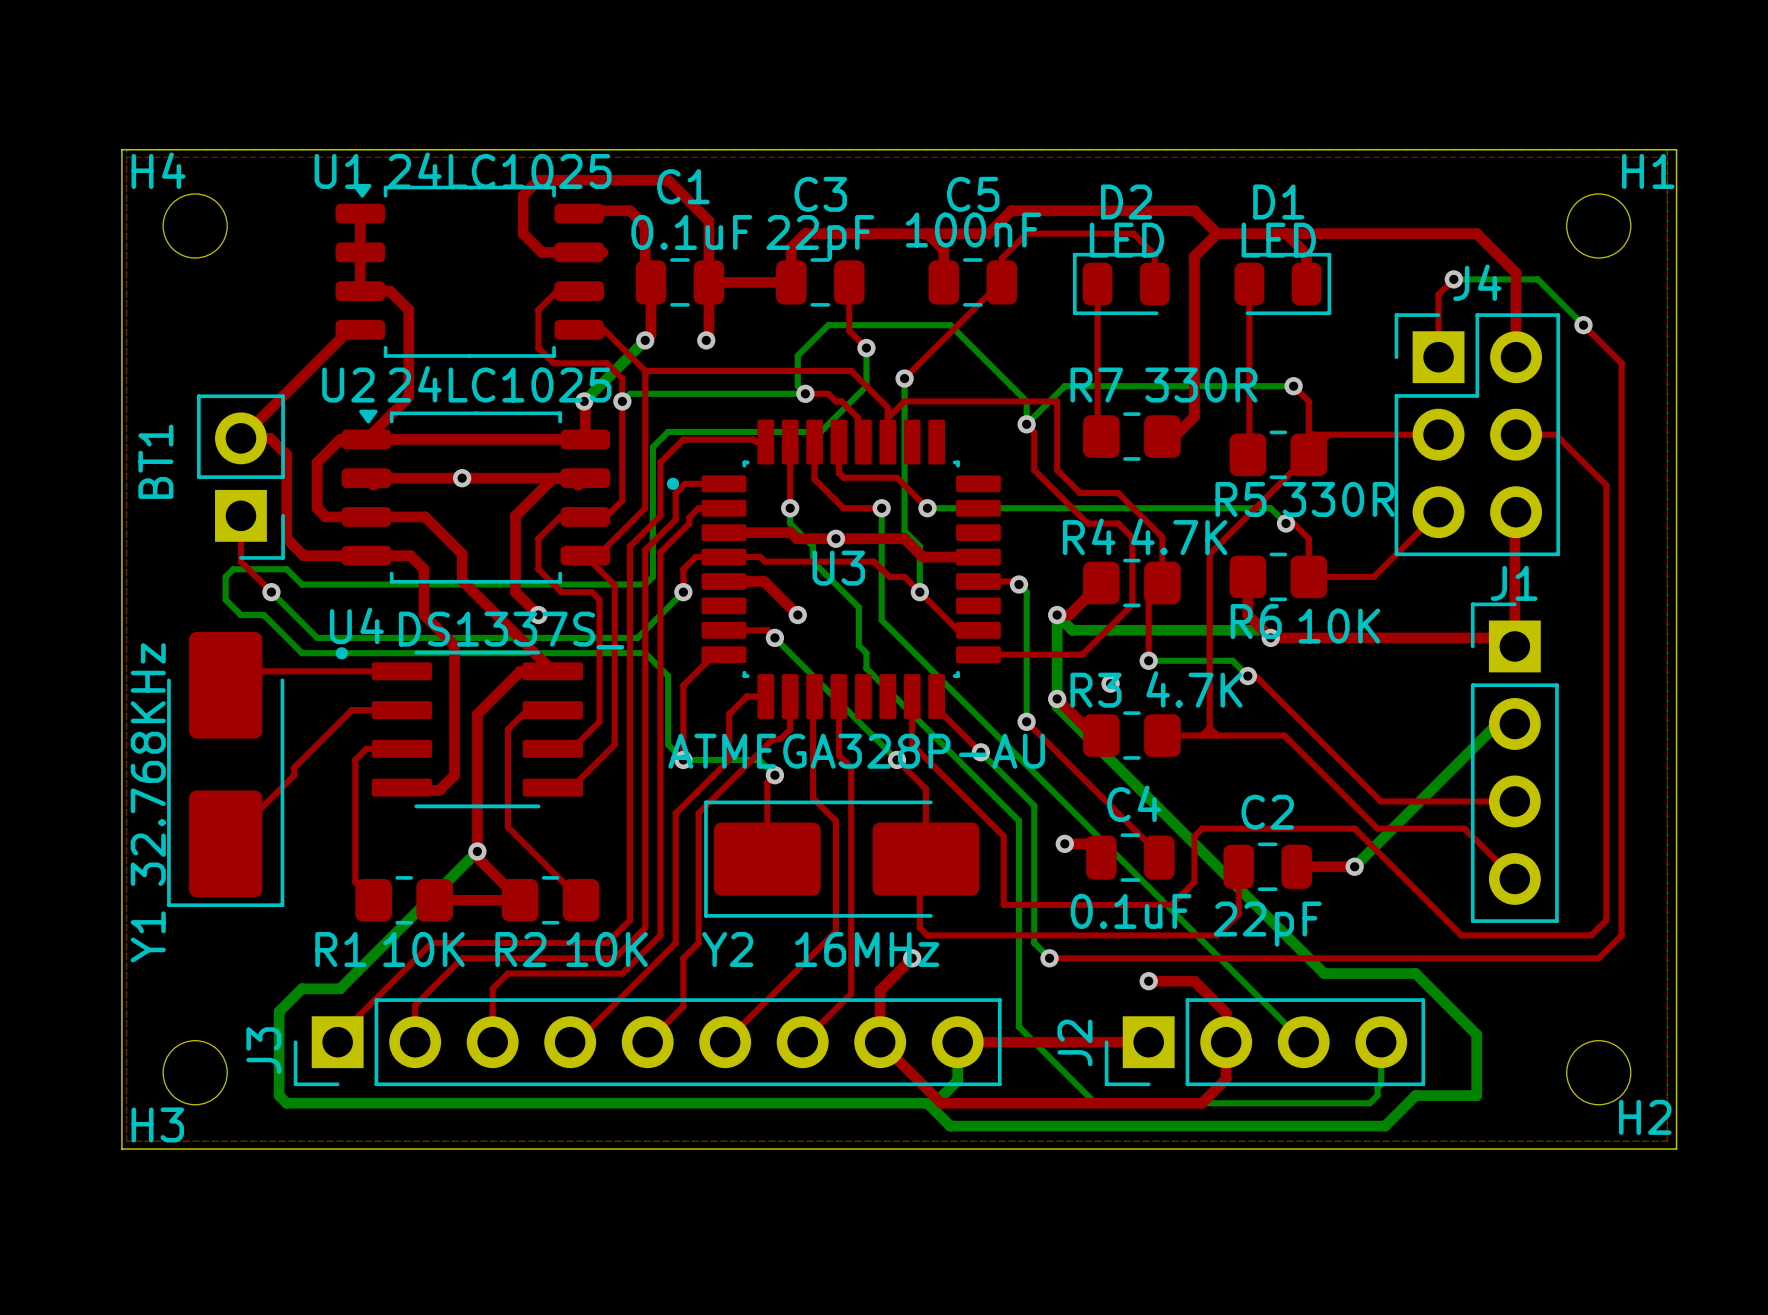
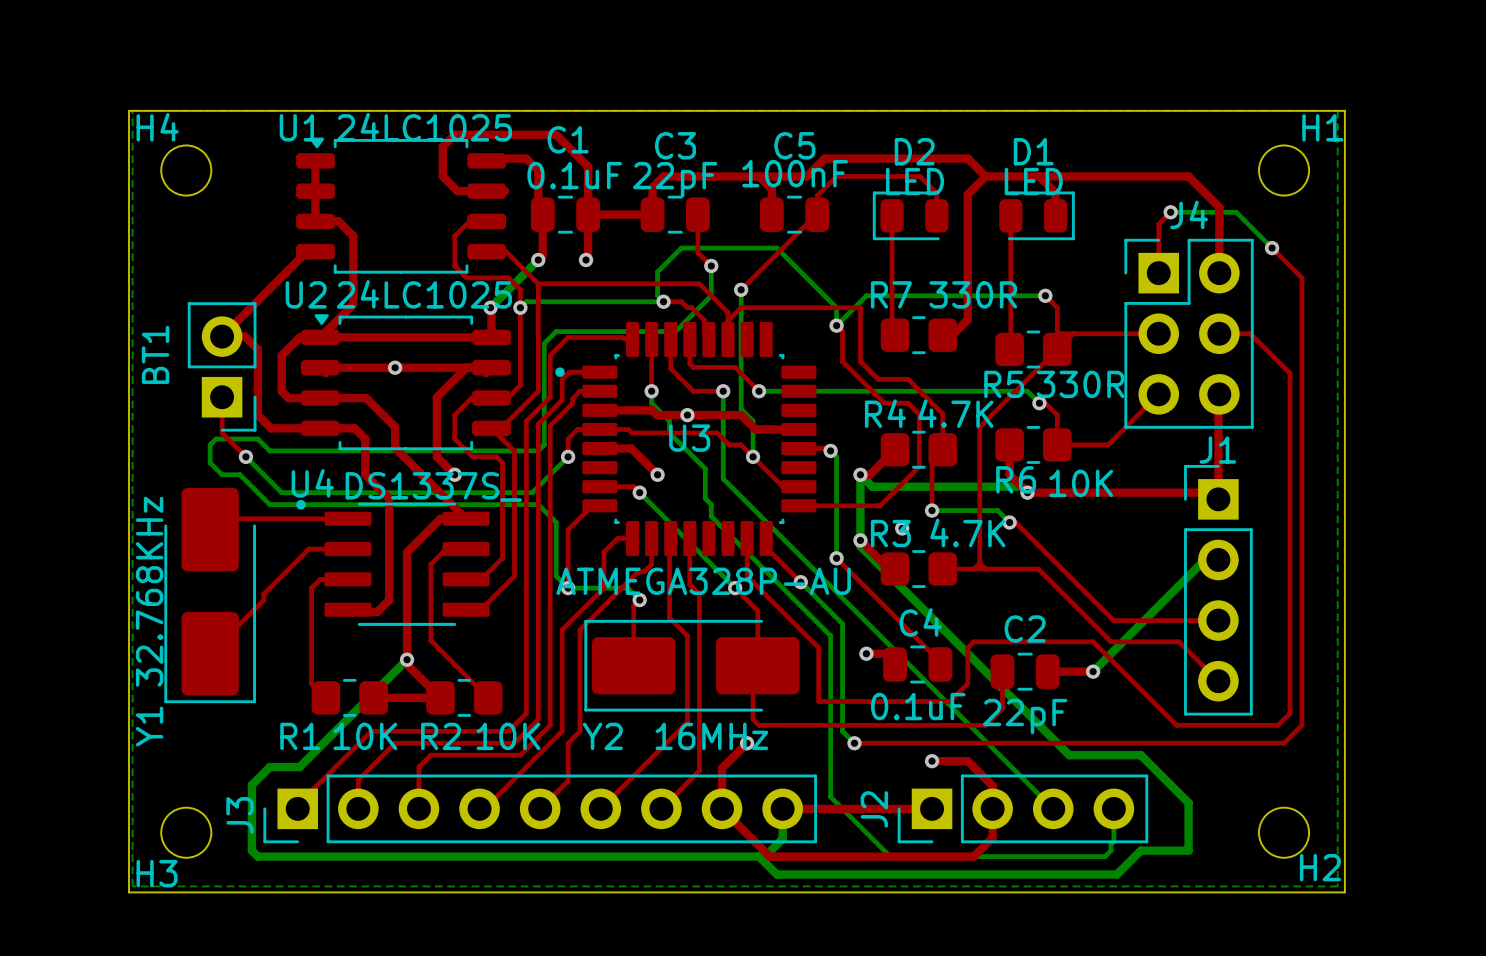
top zone outline: (126, 157) (126, 1141) (1667, 1141) (1667, 157) (126, 157) -> none

